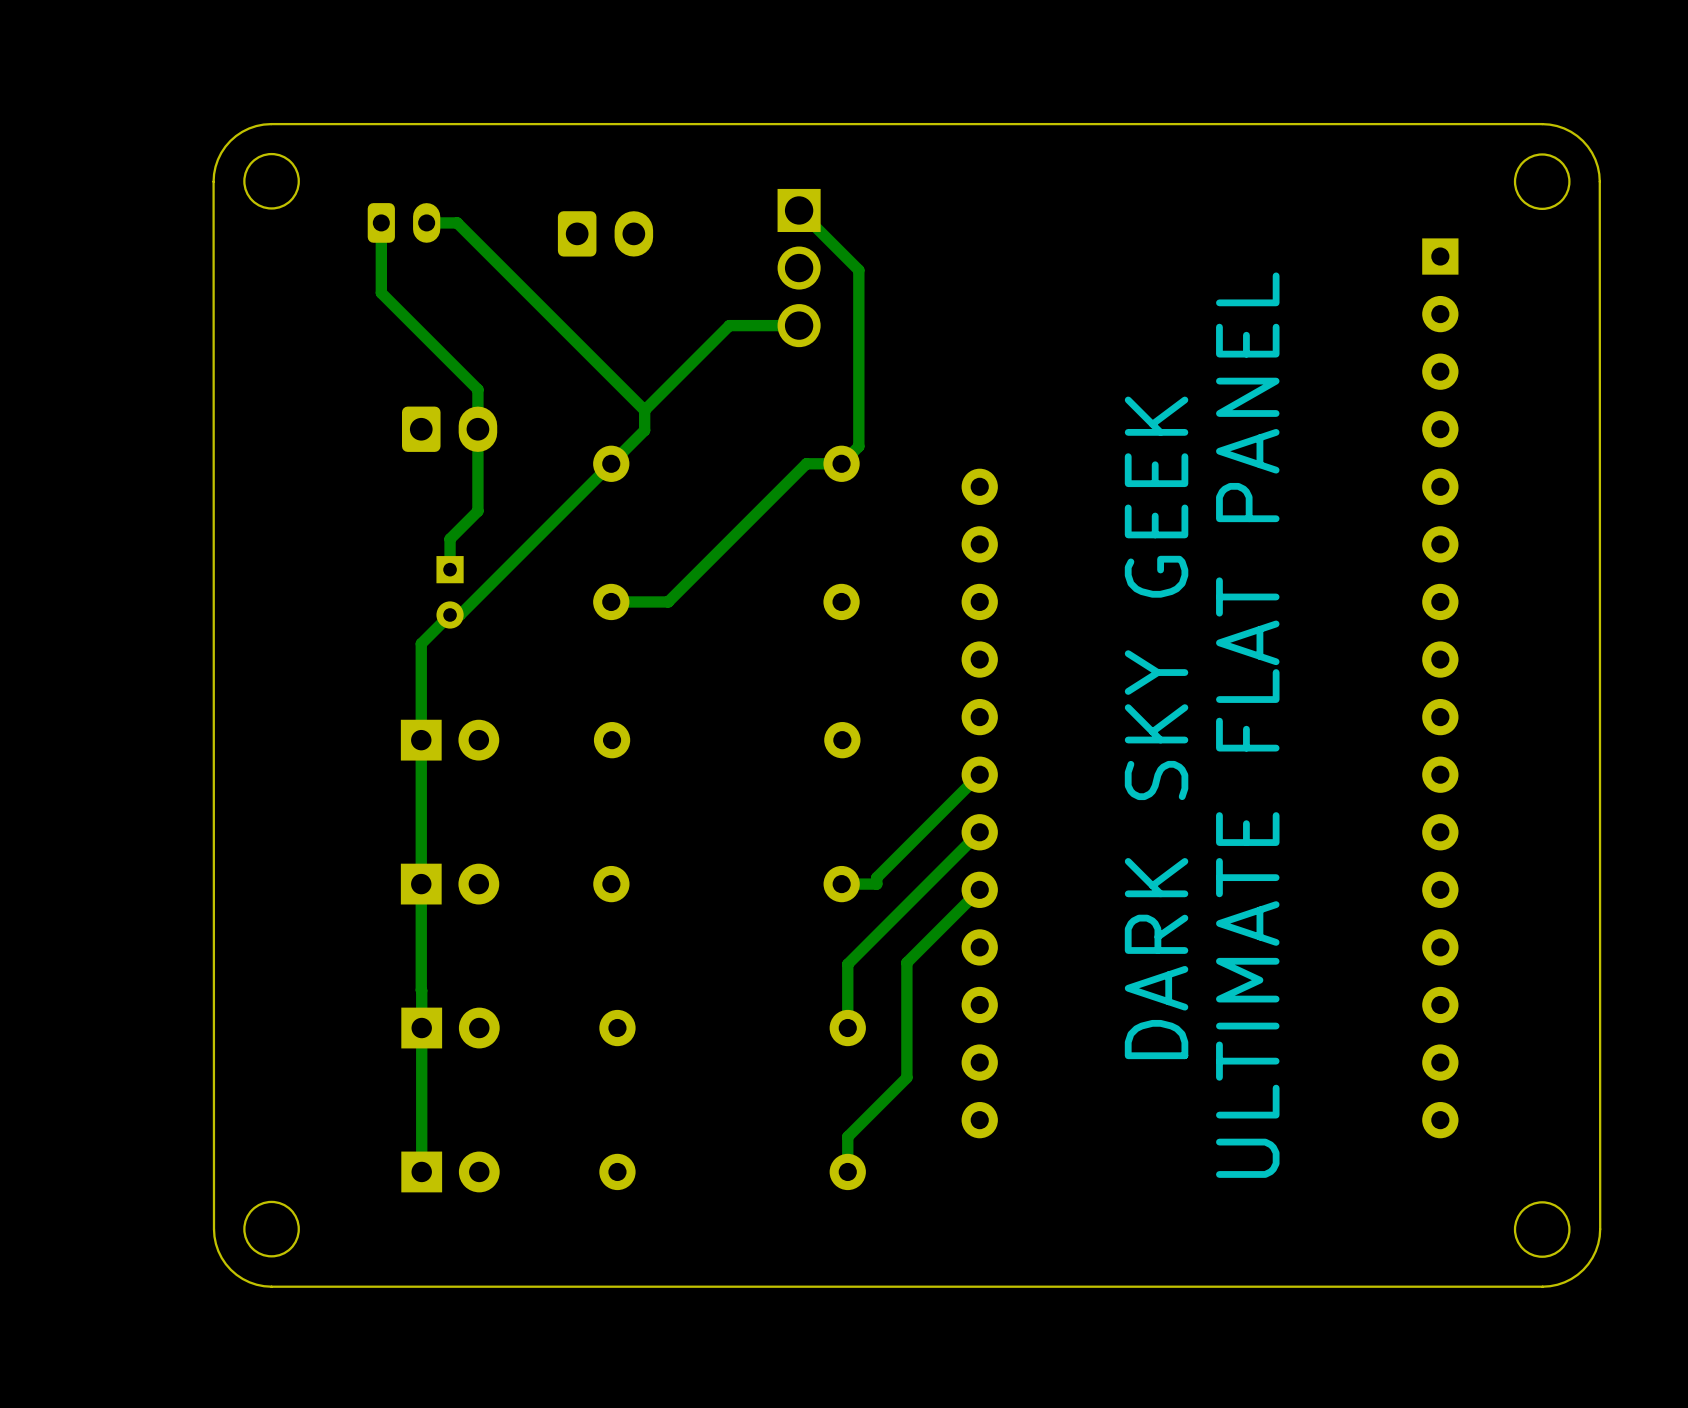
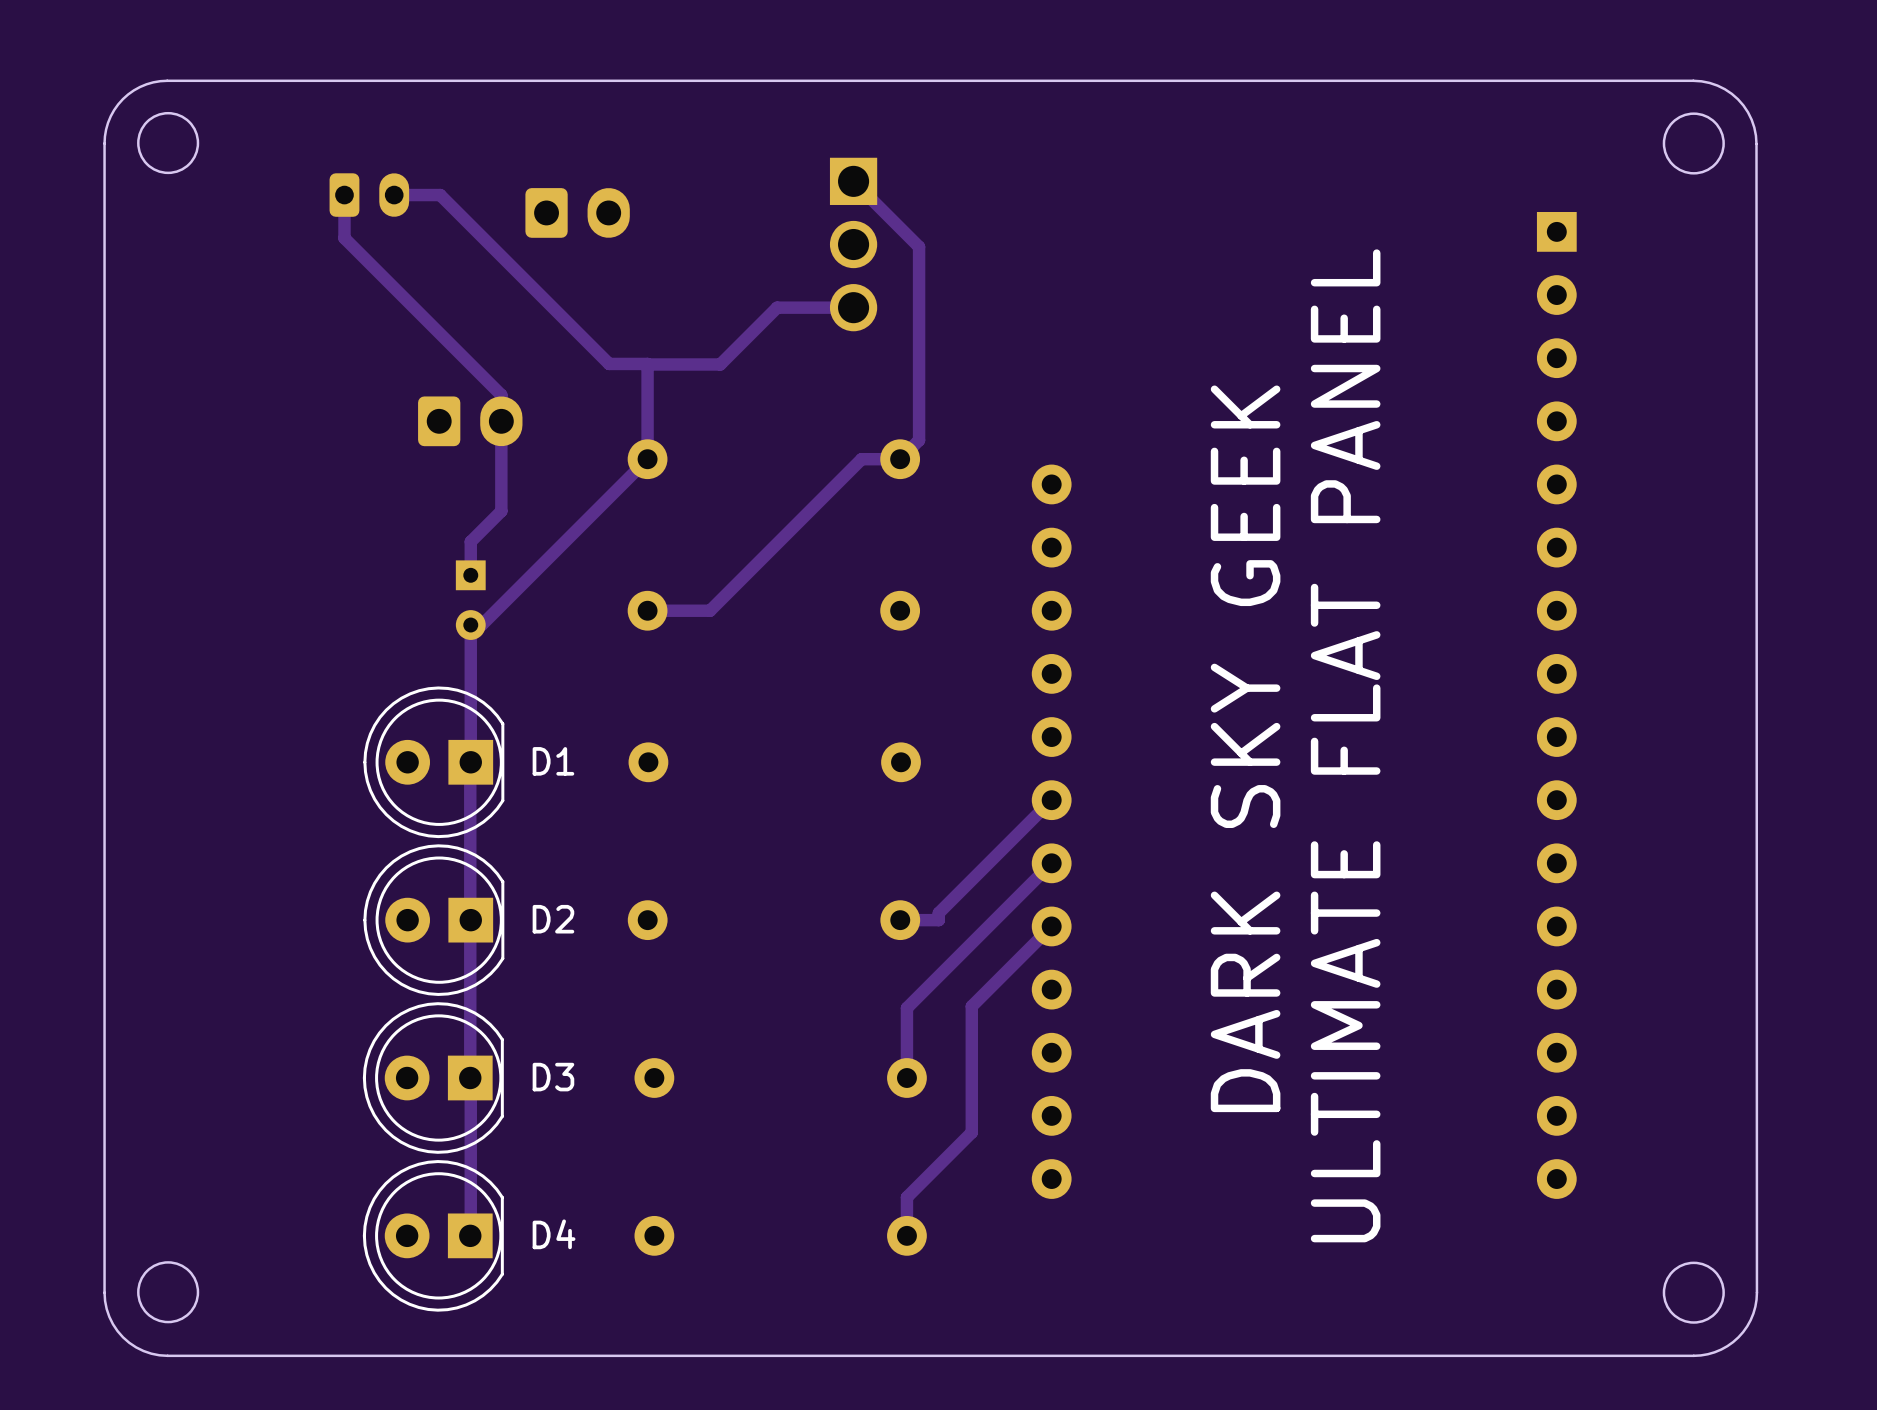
board edge: (1542, 124) (271, 124) (256, 126) (236, 136) (225, 146) (217, 159) (213, 181) (213, 1229) (215, 1244) (225, 1264) (236, 1274) (249, 1282) (271, 1286) (1542, 1286) (1557, 1284) (1577, 1274) (1592, 1257) (1598, 1244) (1600, 1229) (1599, 181) (1595, 159) (1582, 140) (1564, 128) (1542, 124) -> (1693, 80) (1717, 85) (1738, 99) (1751, 119) (1756, 143) (1756, 1292) (1755, 1306) (1750, 1320) (1743, 1332) (1733, 1342) (1714, 1352) (1693, 1355) (167, 1355) (151, 1353) (136, 1347) (117, 1331) (106, 1309) (104, 1292) (104, 143) (106, 129) (110, 116) (118, 104) (128, 94) (146, 84) (167, 80) (1693, 80)
round board edge position: (271, 181) -> (168, 143)
round board edge position: (1542, 181) -> (1693, 143)
track: (381, 222) (381, 292) (477, 389) (477, 405) -> (344, 195) (344, 238) (501, 395)
part position: (403, 222) -> (369, 195)
track: (426, 222) (457, 222) (644, 410) -> none
part position: (605, 233) -> (577, 212)
track: (677, 377) (644, 410) -> (720, 364) (647, 364)
track: (644, 410) (644, 430) (611, 463) -> (394, 195) (440, 195) (609, 363) (647, 363) (647, 459)
track: (450, 614) (421, 643) (421, 1171) -> (470, 625) (470, 762)
track: none -> (470, 762) (470, 1077)
D1 side: top (450, 740) -> bottom (433, 762)
D2 side: top (450, 884) -> bottom (433, 920)
track: none -> (470, 1078) (470, 1235)
D3 side: top (450, 1028) -> bottom (433, 1078)
D4 side: top (450, 1171) -> bottom (433, 1235)
round board edge position: (271, 1229) -> (168, 1292)
round board edge position: (1542, 1229) -> (1693, 1292)

